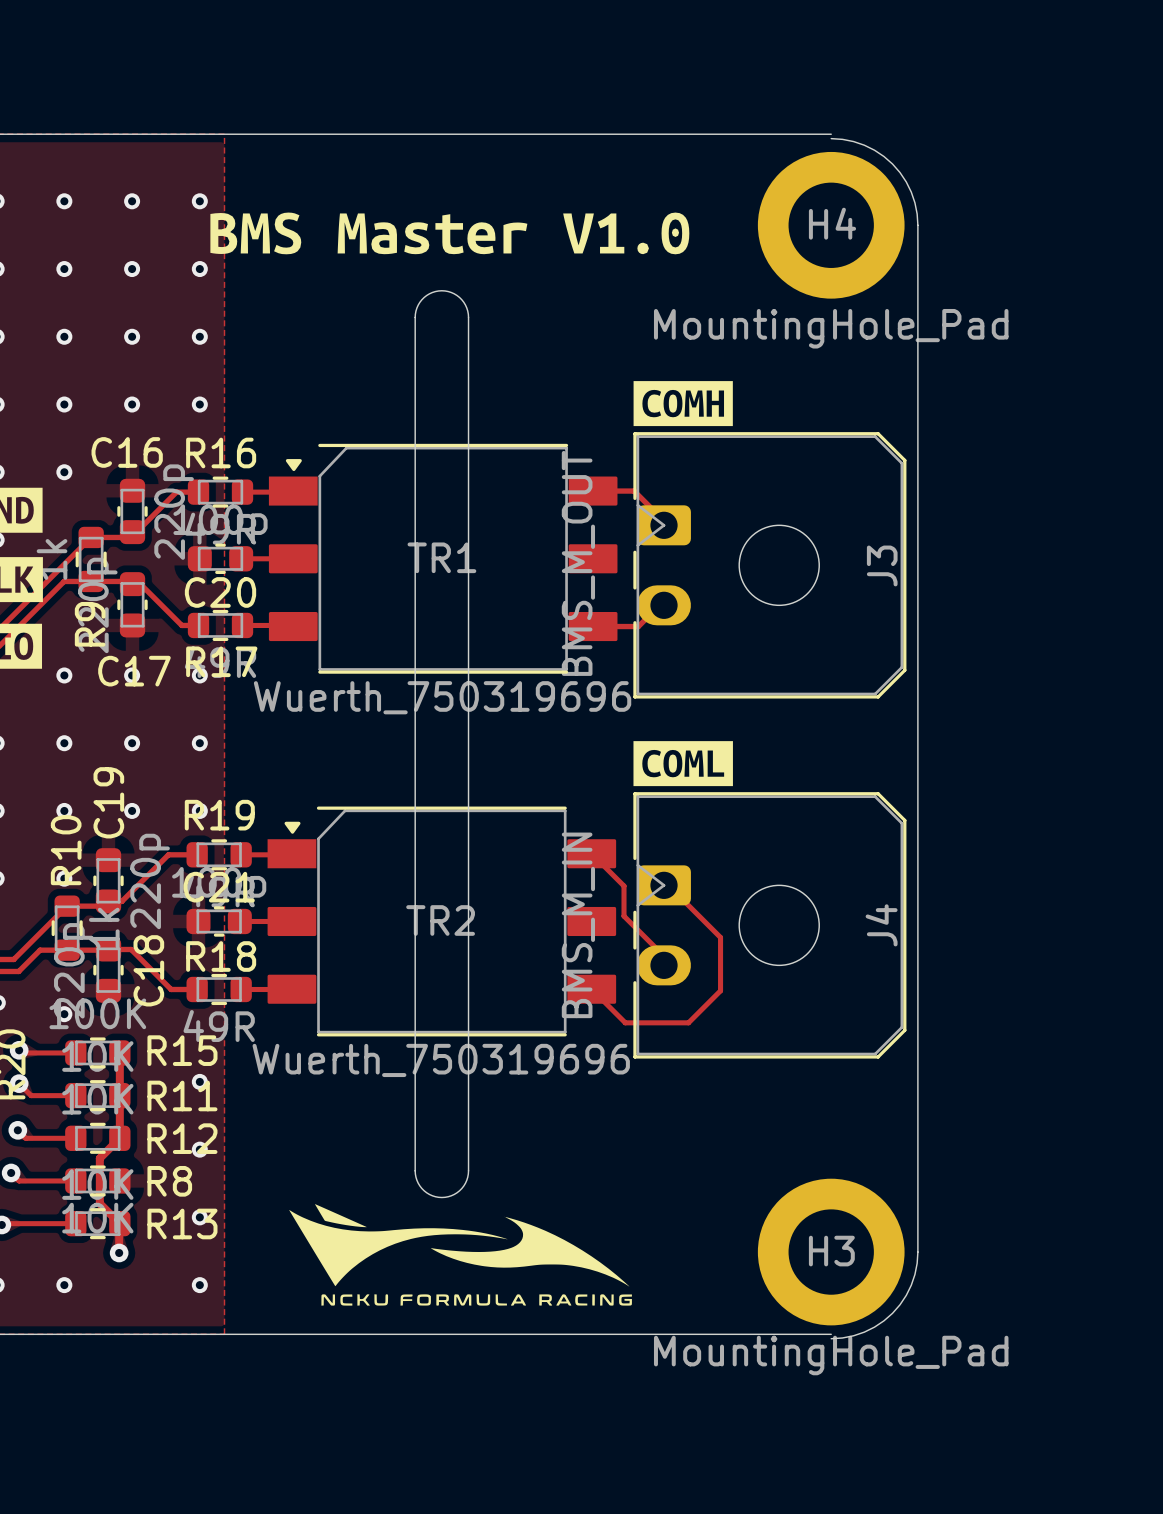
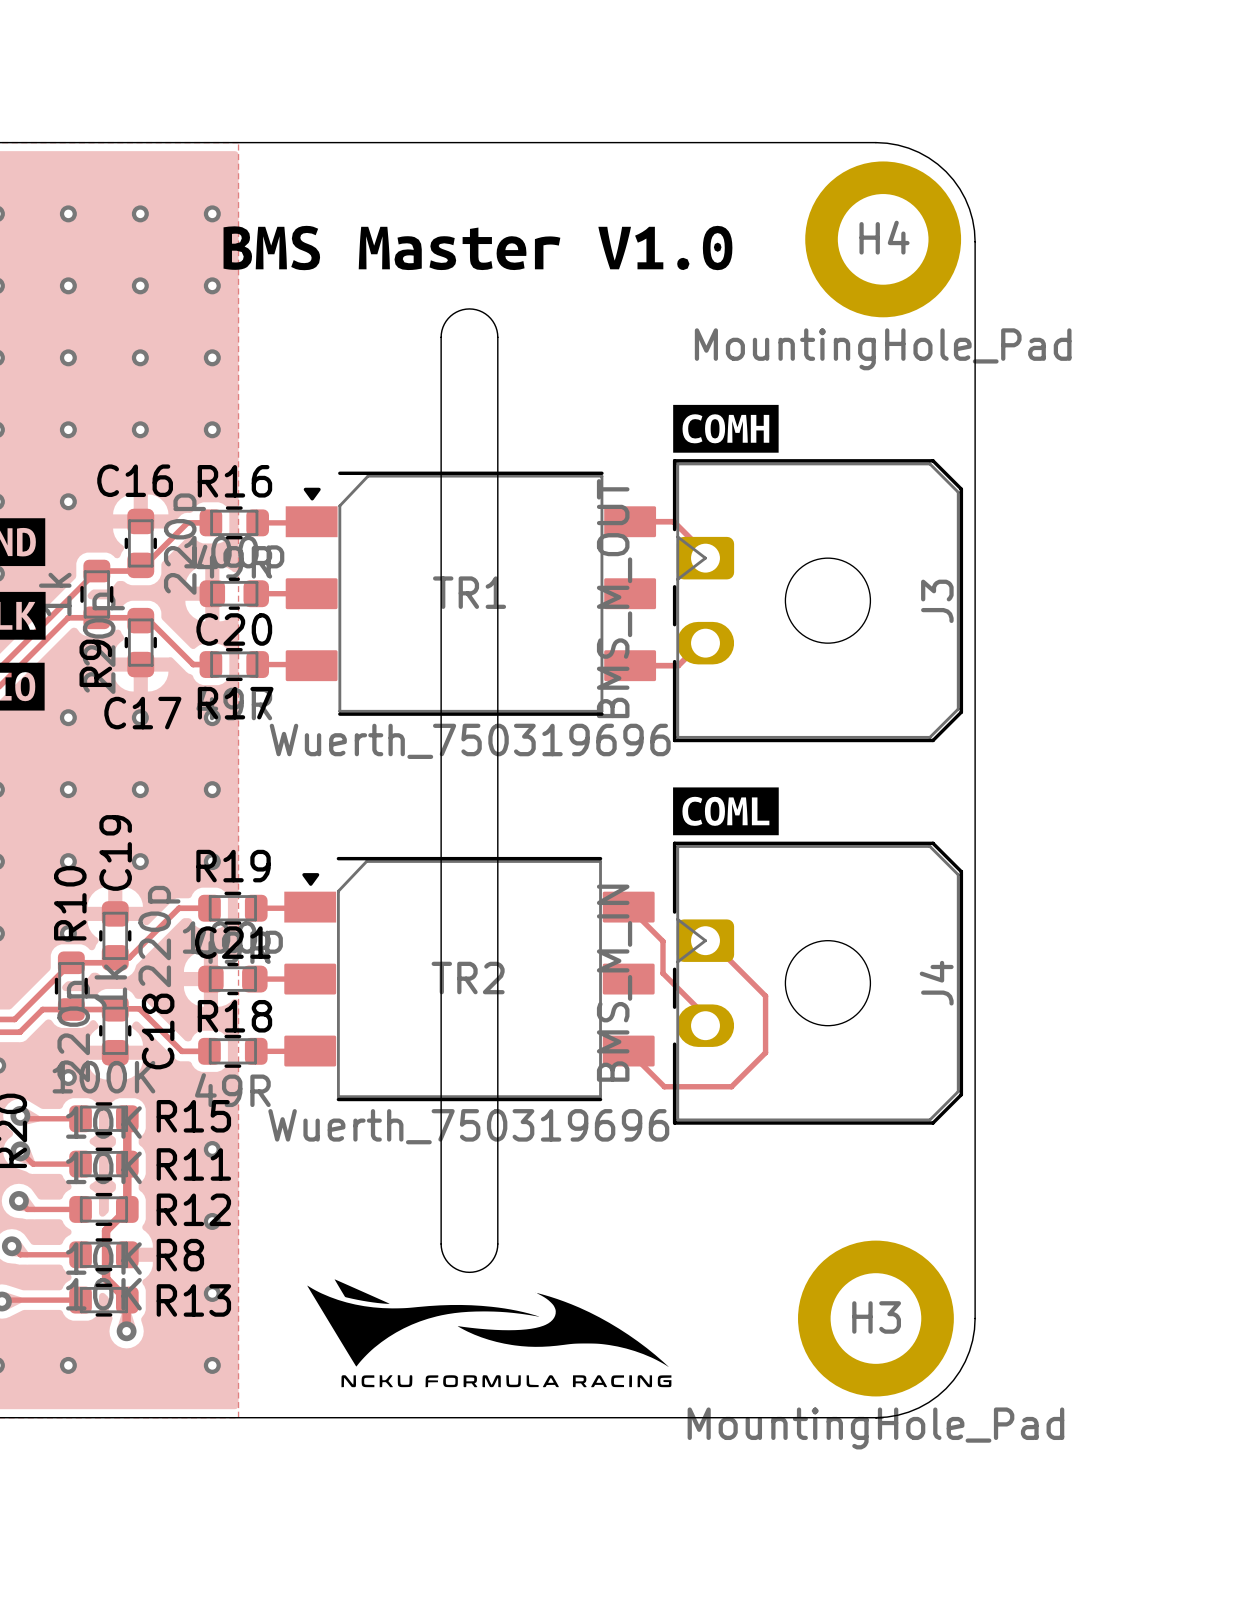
board edge: (824, 134) (831, 134) -> (875, 142) (908, 148) (928, 157) (946, 171) (959, 189) (969, 209) (975, 241) (974, 1329) (965, 1361) (946, 1388) (928, 1402) (908, 1412) (875, 1417)
board edge: (831, 138) (864, 145) (892, 164) (911, 192) (917, 225) (917, 1263) (906, 1295) (883, 1320) (853, 1335) (831, 1338) -> none
H3 position: (831, 1252) -> (875, 1318)

